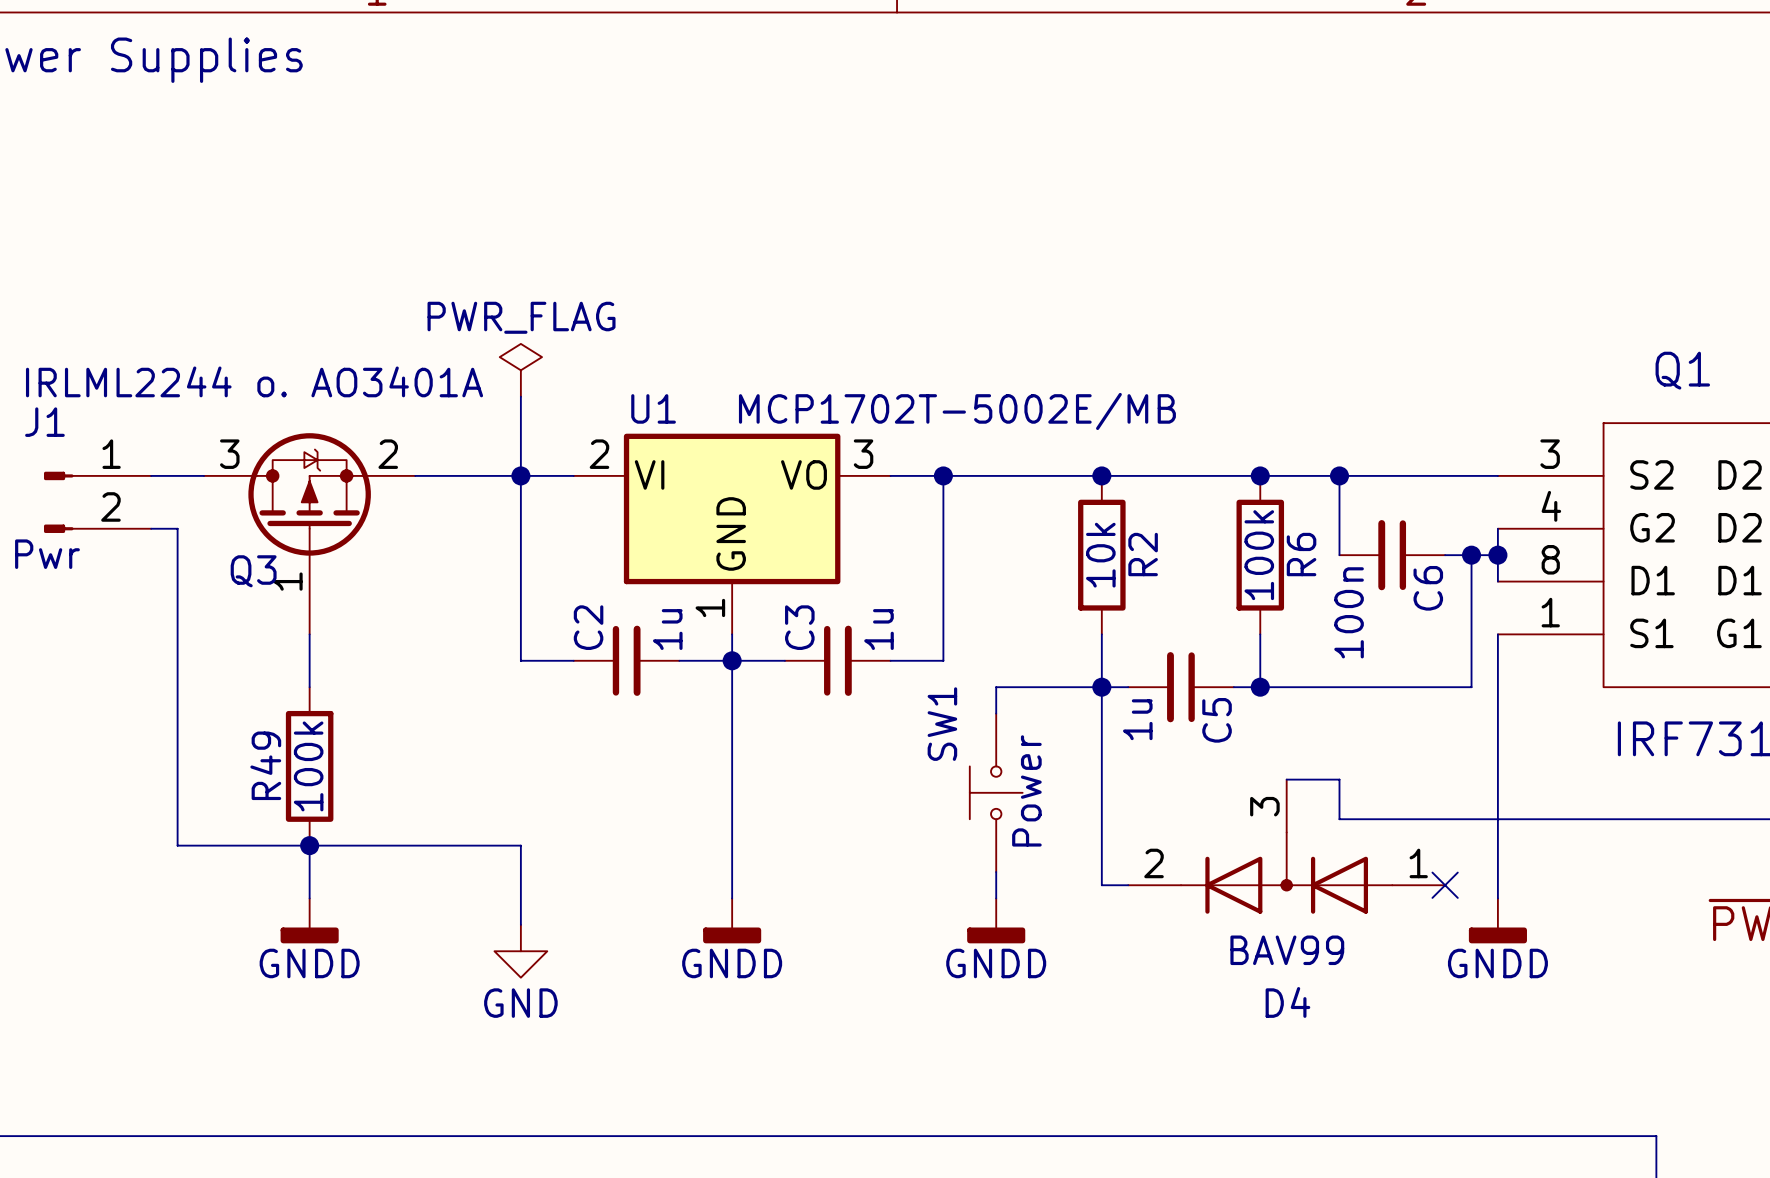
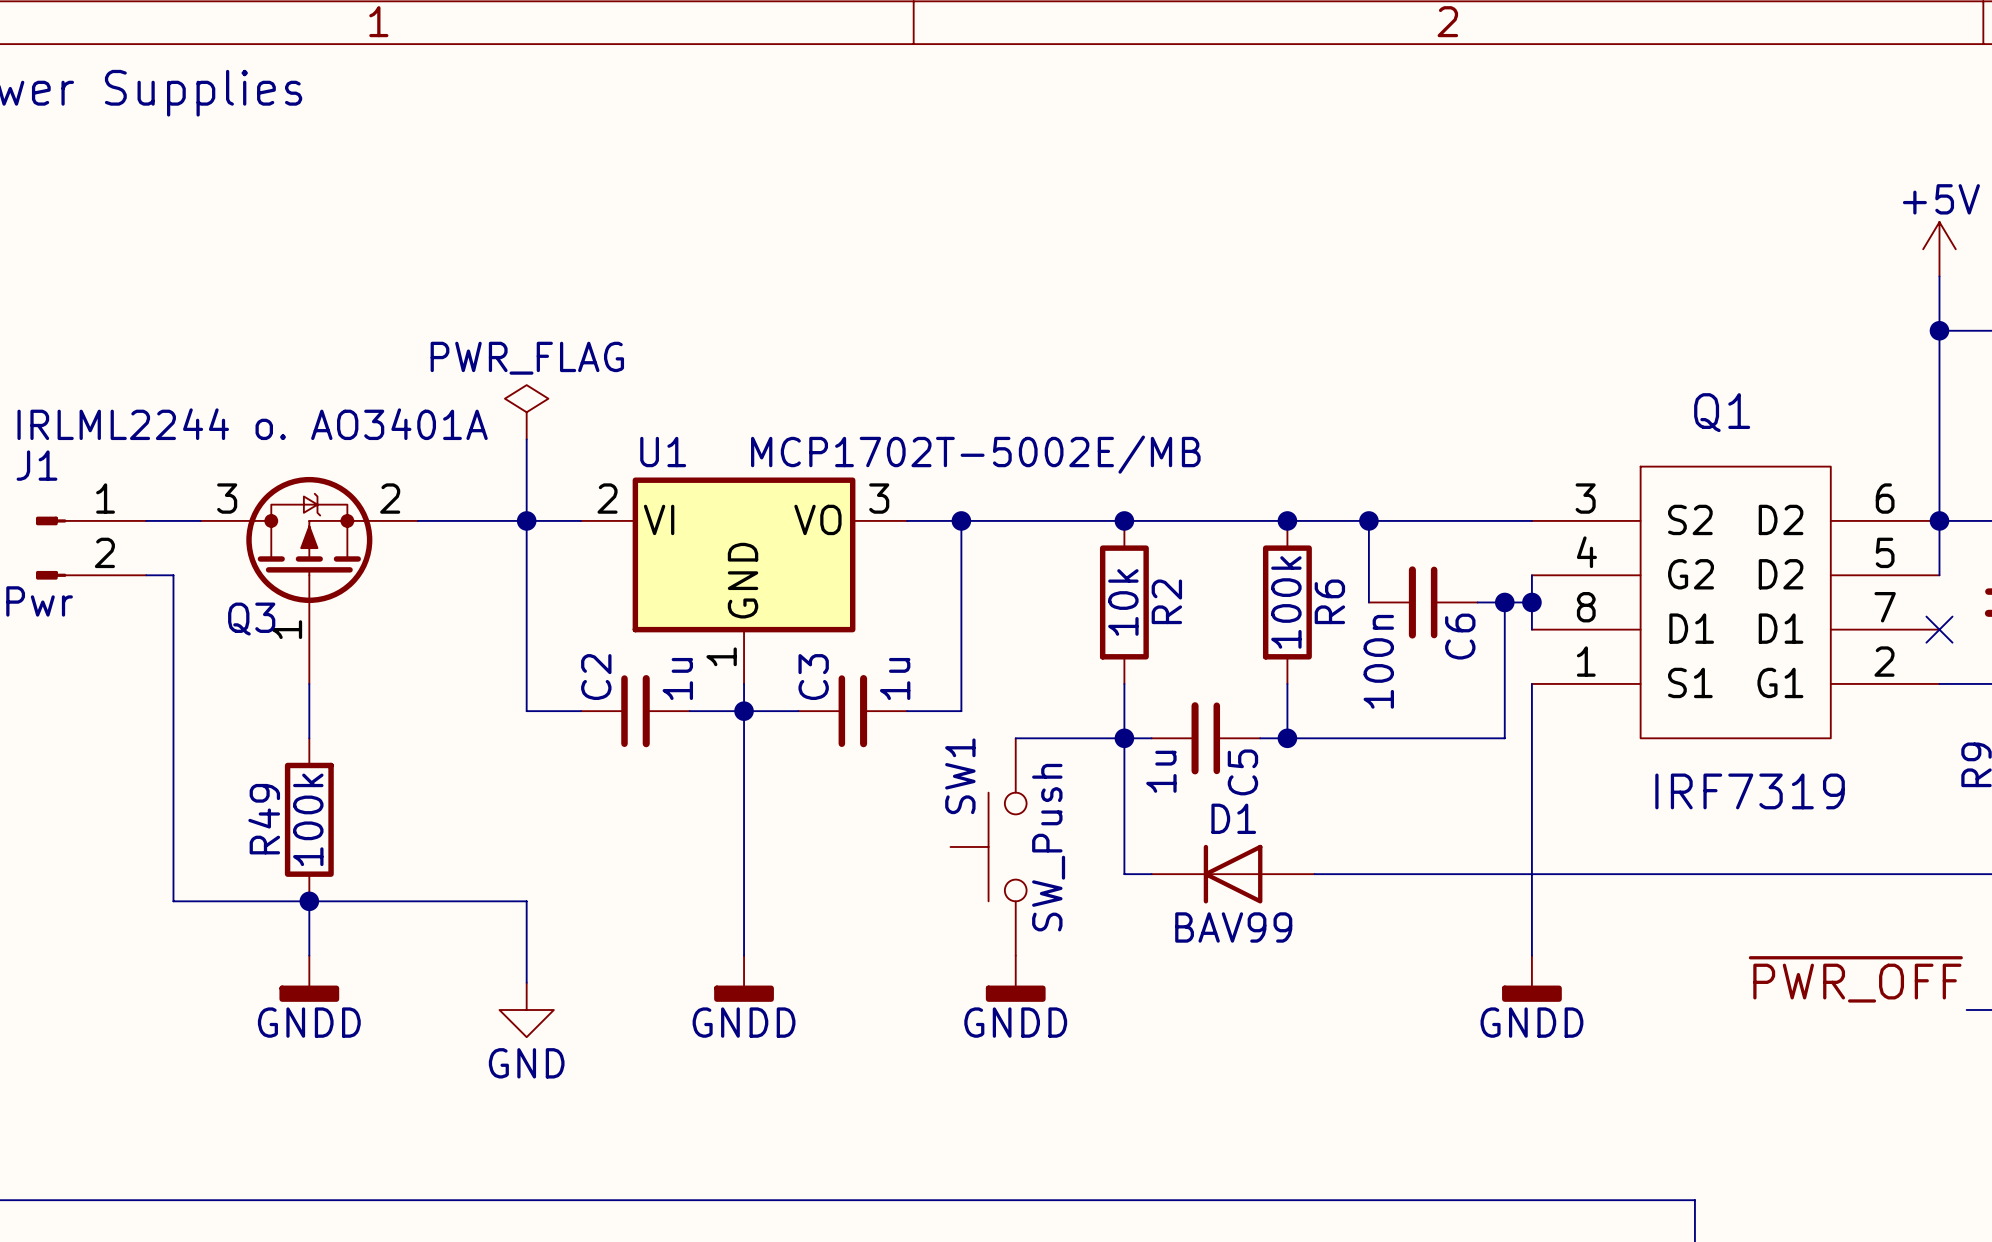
SW1 symbol: [969, 713, 1023, 873] -> [950, 738, 1027, 956]
wire: (1286, 779) (1339, 779) (1339, 819) -> (1314, 874) (1368, 874)
SW1 value: Power (1026, 790) -> SW_Push (1048, 847)
wire: (1101, 819) (1101, 885) (1128, 885) -> (1124, 874) (1151, 874)
D1: none -> BAV99 (1233, 874)
D4: BAV99 (1286, 846) -> none
no-connect mark: (1445, 885) -> none

